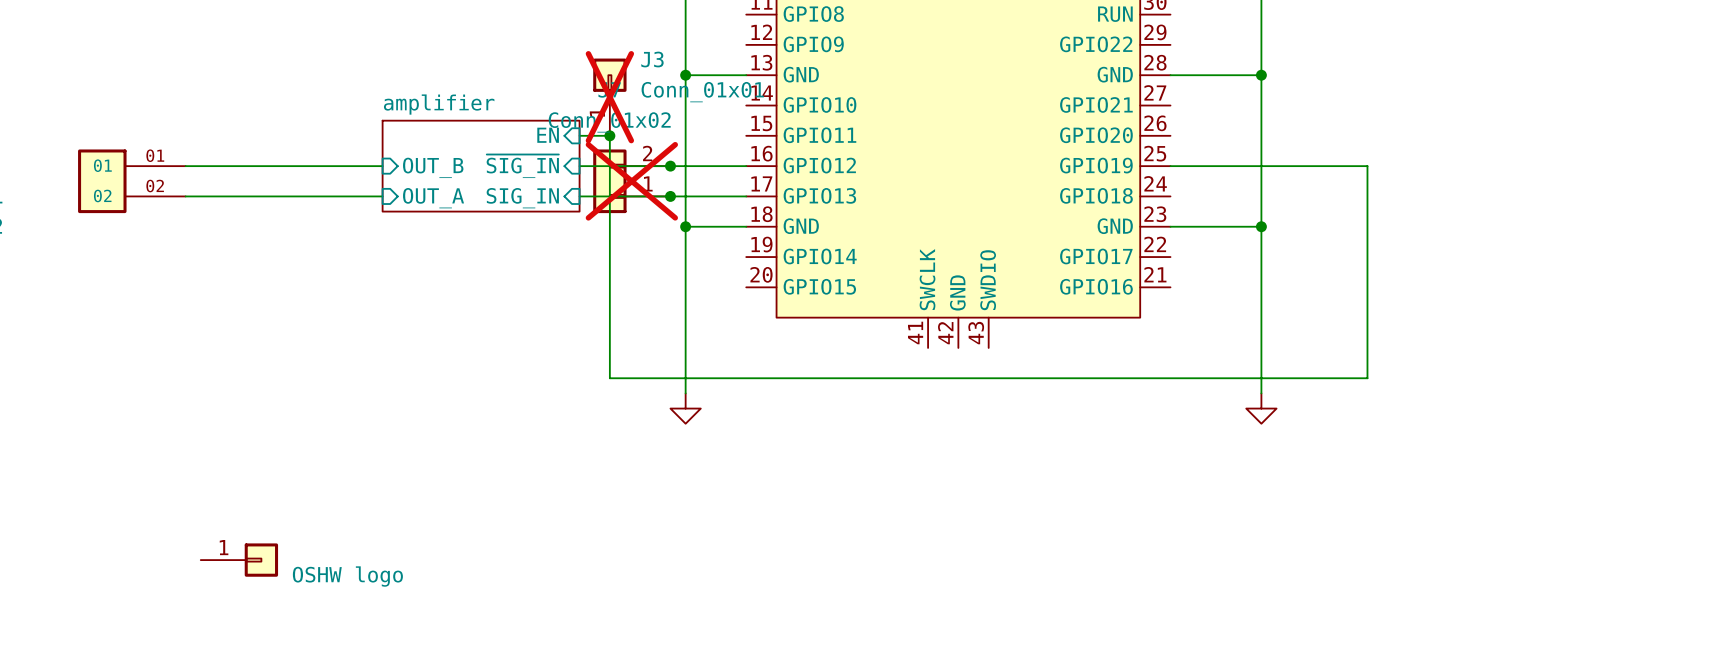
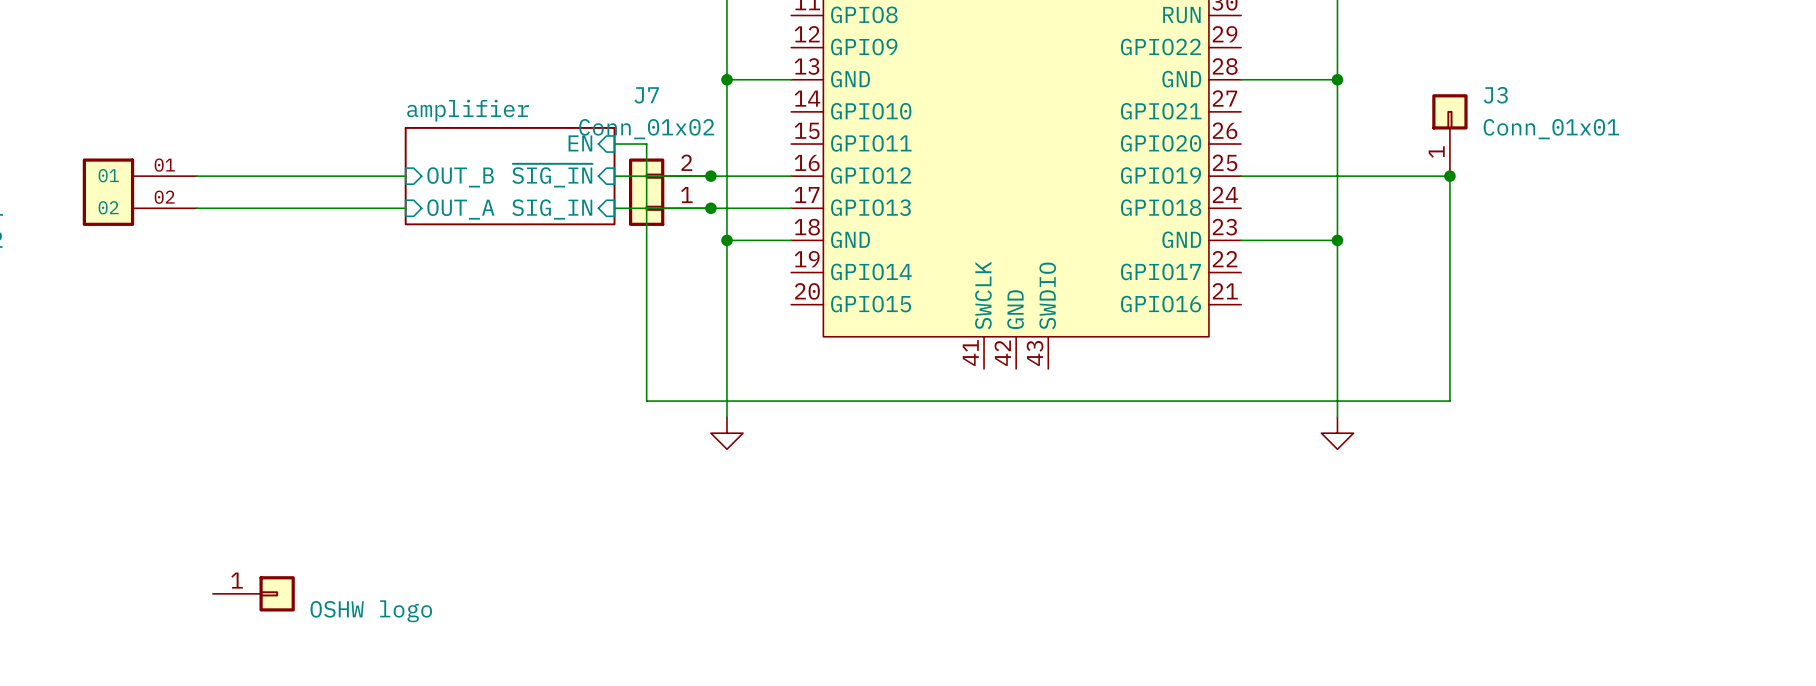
J3 position: (609, 97) -> (1449, 135)
J3 do-not-place cross: (609, 97) -> none
junction: (609, 135) -> none
junction: none -> (1449, 176)
J7 do-not-place cross: (631, 181) -> none

